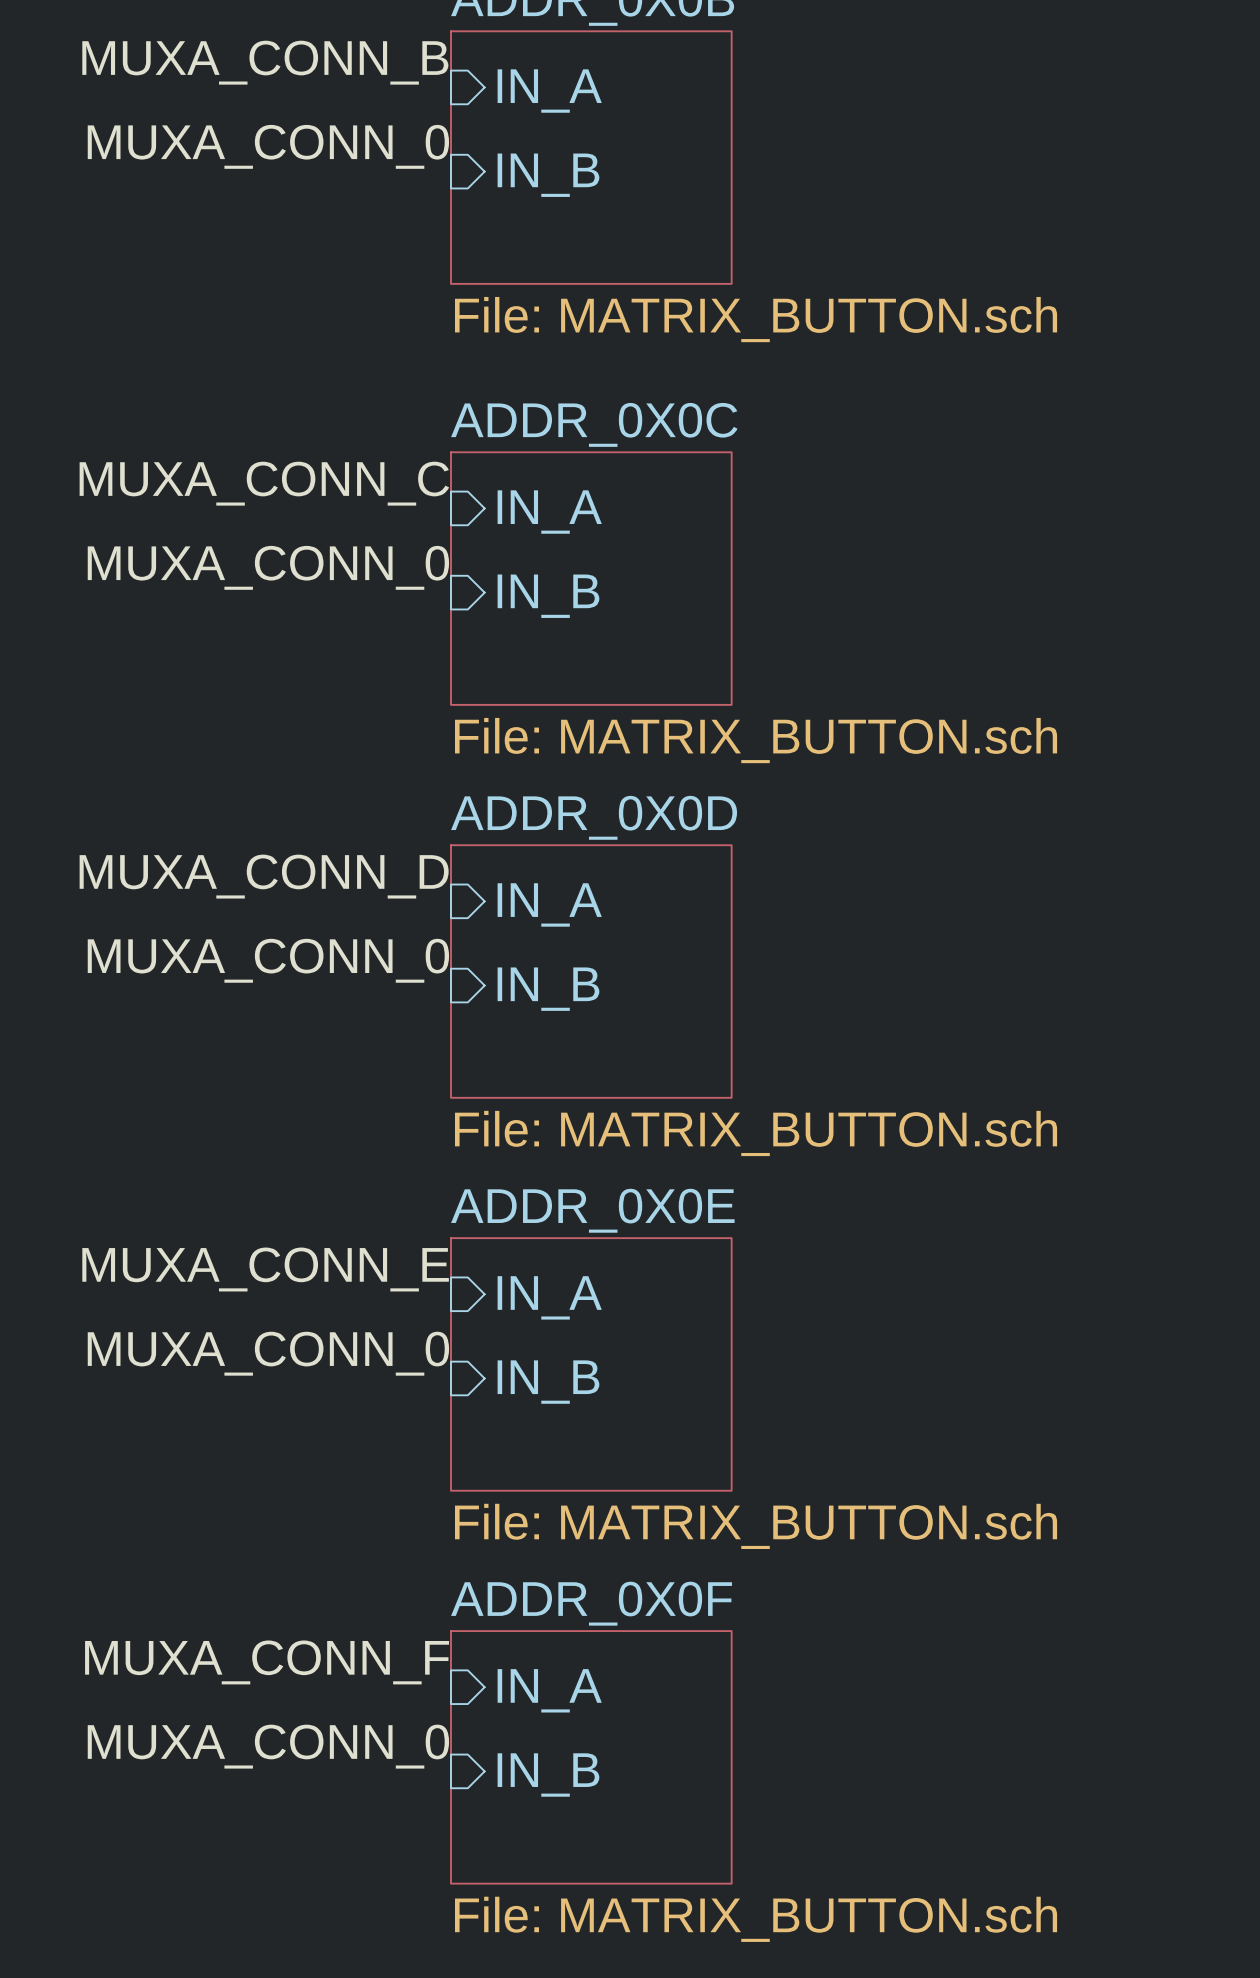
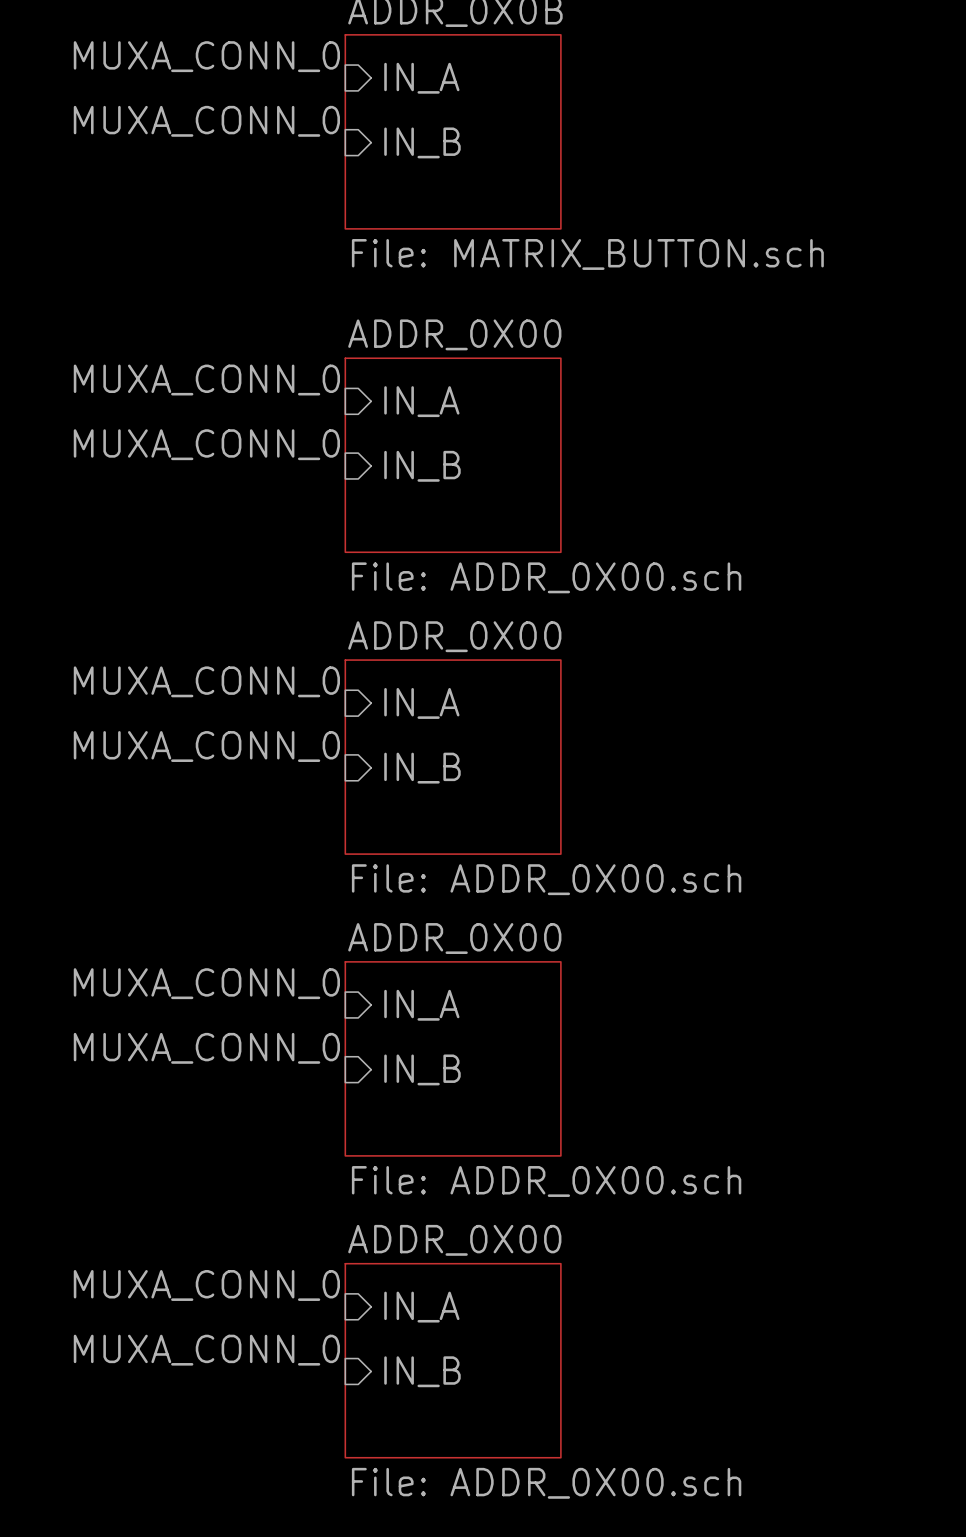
label: MUXA_CONN_B (265, 62) -> MUXA_CONN_0 (206, 56)
sheet ADDR_0X0C name: ADDR_0X0C (594, 424) -> ADDR_0X00 (454, 334)
label: MUXA_CONN_C (264, 483) -> MUXA_CONN_0 (206, 380)
sheet ADDR_0X0C value: File: MATRIX_BUTTON.sch (756, 740) -> File: ADDR_0X00.sch (546, 577)
sheet ADDR_0X0D name: ADDR_0X0D (594, 817) -> ADDR_0X00 (454, 636)
label: MUXA_CONN_D (264, 876) -> MUXA_CONN_0 (206, 681)
sheet ADDR_0X0D value: File: MATRIX_BUTTON.sch (756, 1133) -> File: ADDR_0X00.sch (546, 879)
sheet ADDR_0X0E name: ADDR_0X0E (592, 1210) -> ADDR_0X00 (454, 938)
label: MUXA_CONN_E (265, 1269) -> MUXA_CONN_0 (206, 983)
sheet ADDR_0X0E value: File: MATRIX_BUTTON.sch (756, 1526) -> File: ADDR_0X00.sch (546, 1181)
sheet ADDR_0X0F name: ADDR_0X0F (591, 1603) -> ADDR_0X00 (454, 1240)
label: MUXA_CONN_F (267, 1662) -> MUXA_CONN_0 (206, 1285)
sheet ADDR_0X0F value: File: MATRIX_BUTTON.sch (756, 1919) -> File: ADDR_0X00.sch (546, 1483)

